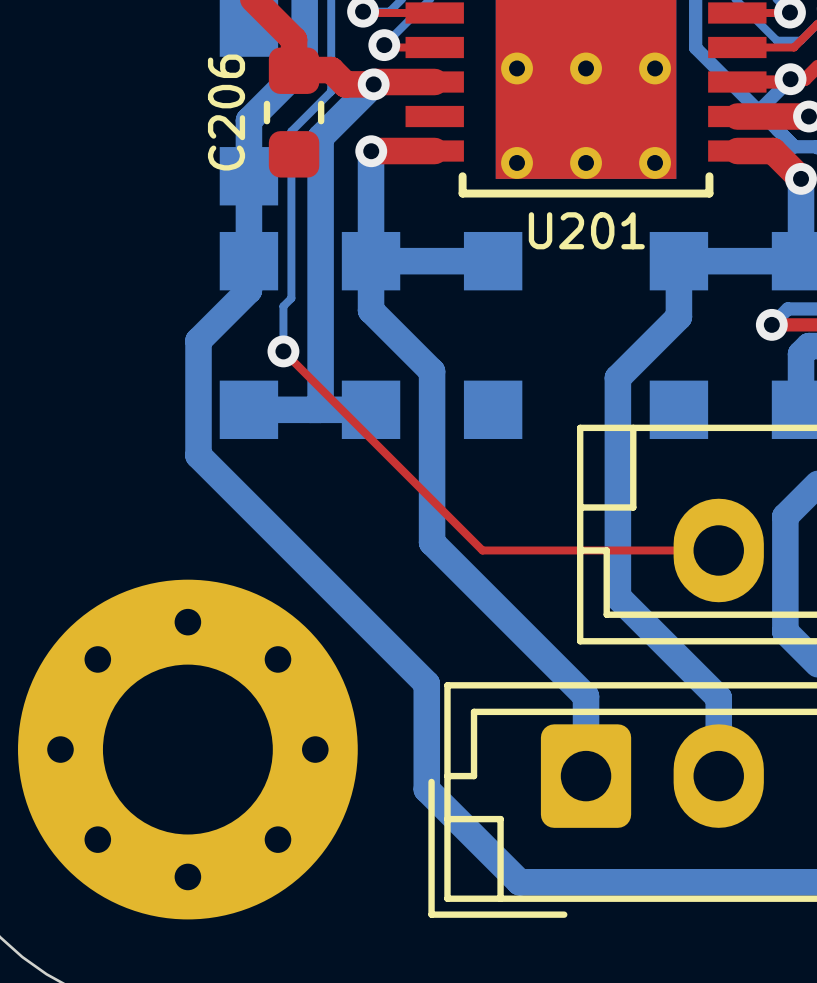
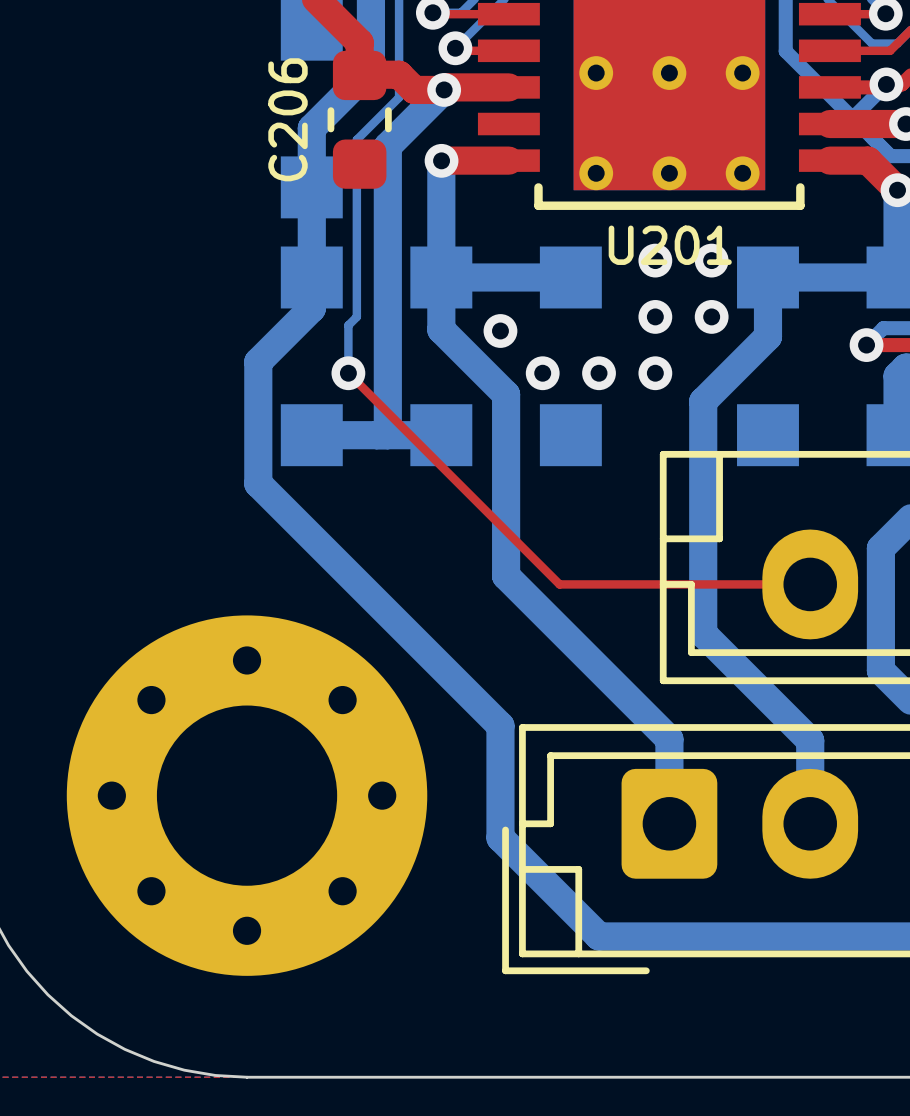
via: none -> (655, 260)
via: none -> (711, 260)
via: none -> (655, 316)
via: none -> (711, 316)
via: none -> (500, 330)
via: none -> (542, 373)
via: none -> (599, 373)
via: none -> (655, 373)

